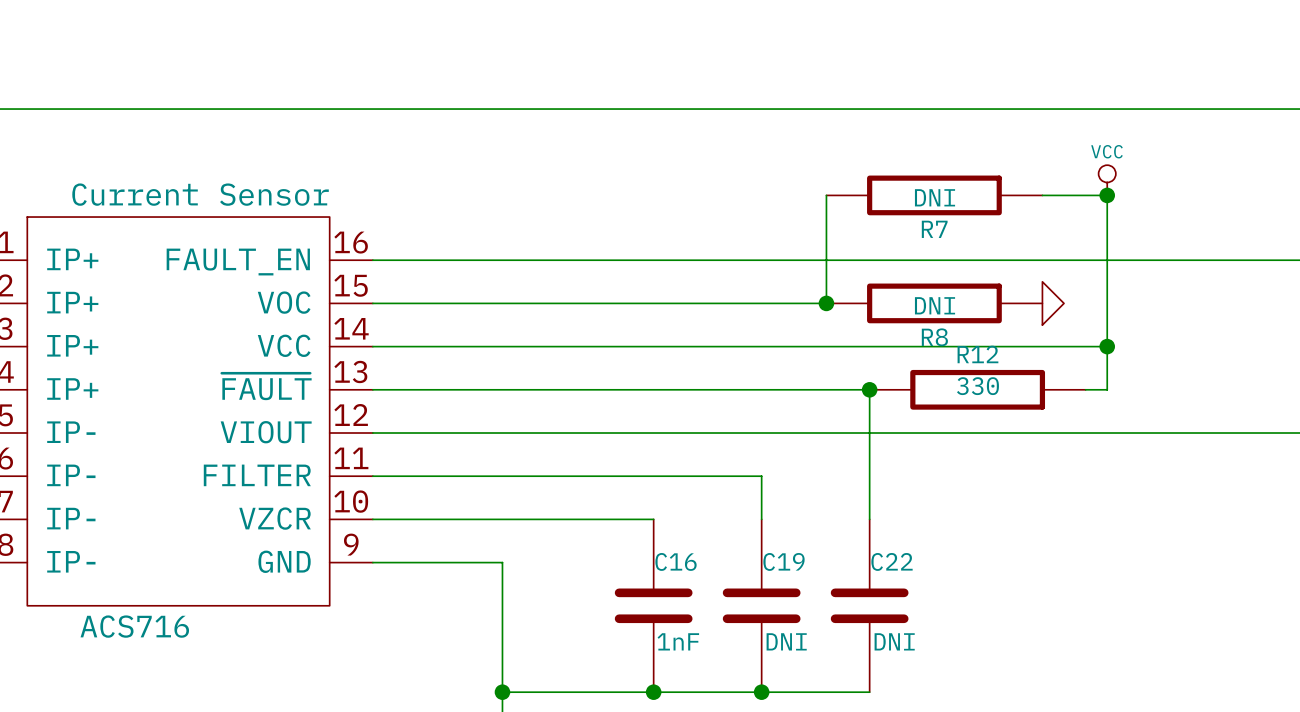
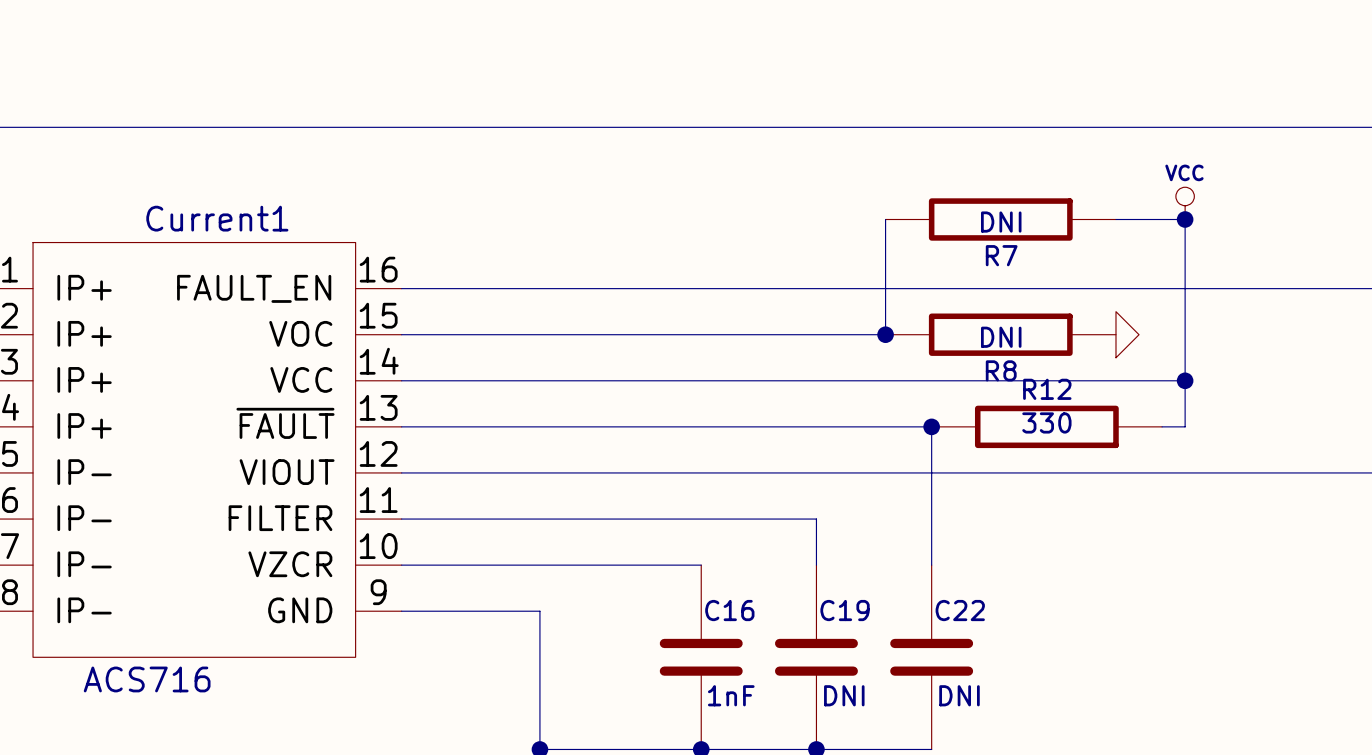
Current Sensor name: Current Sensor (200, 194) -> Current1 (217, 218)

